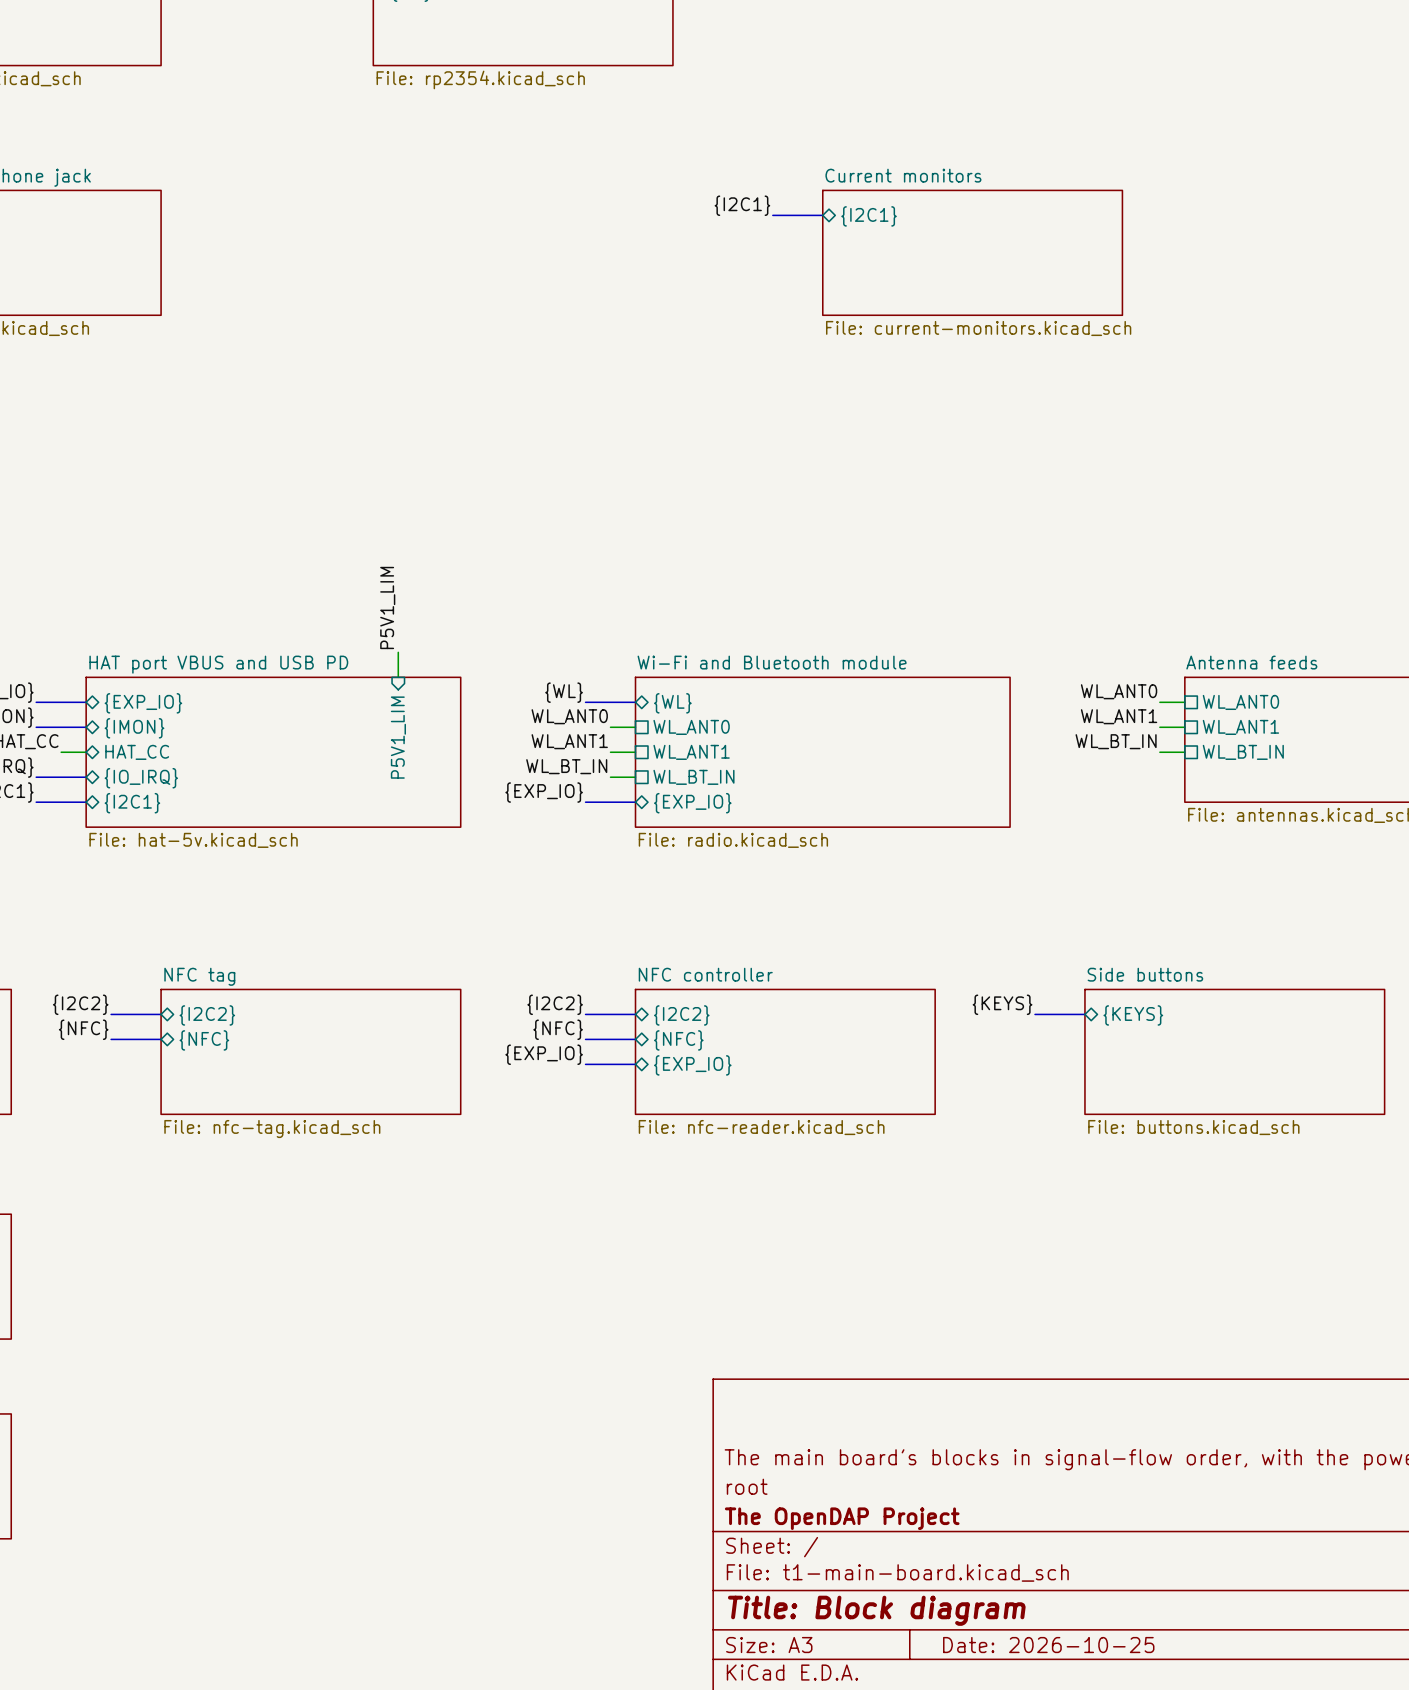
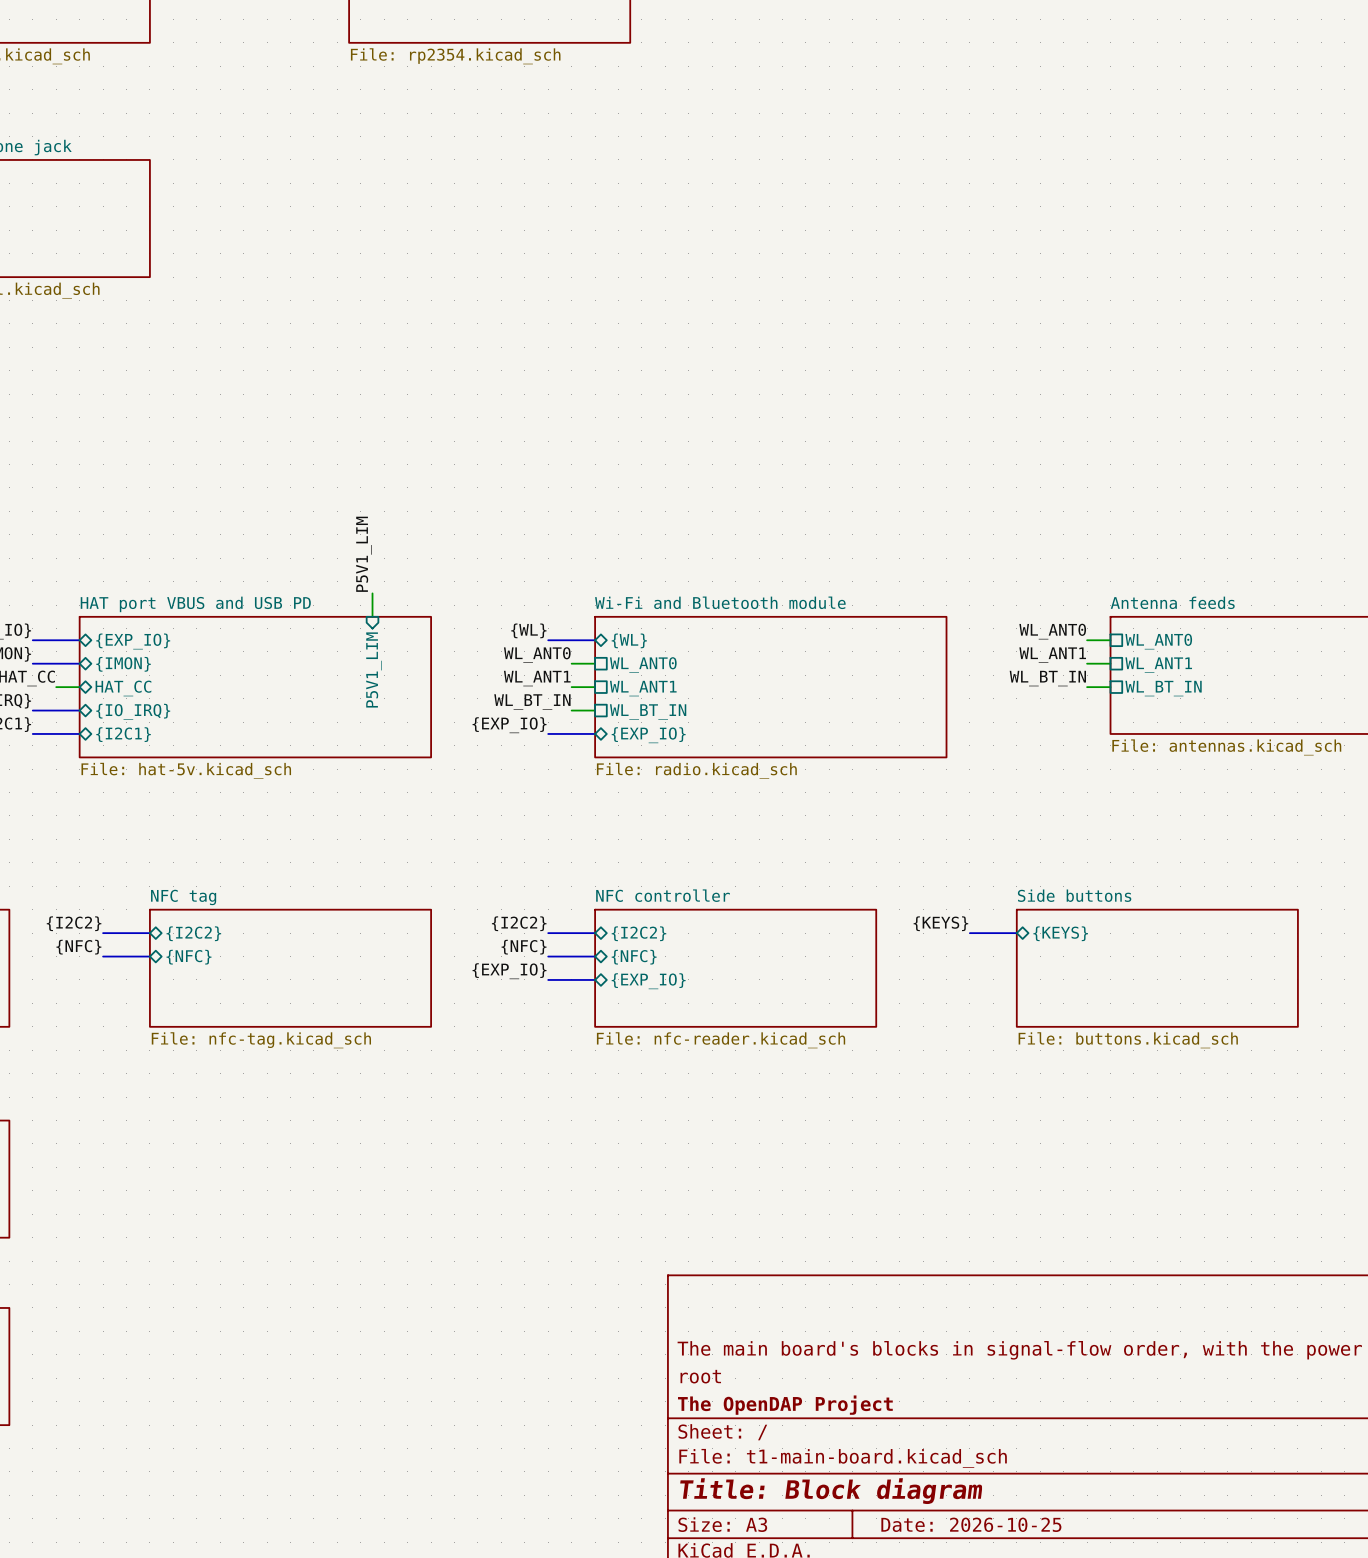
label: {I2C1} (742, 205) -> none
bus: (772, 215) (822, 215) -> none
sheet pin: {I2C1} (869, 216) -> none
sheet Current monitors: File: current-monitors.kicad_sch (972, 252) -> none

